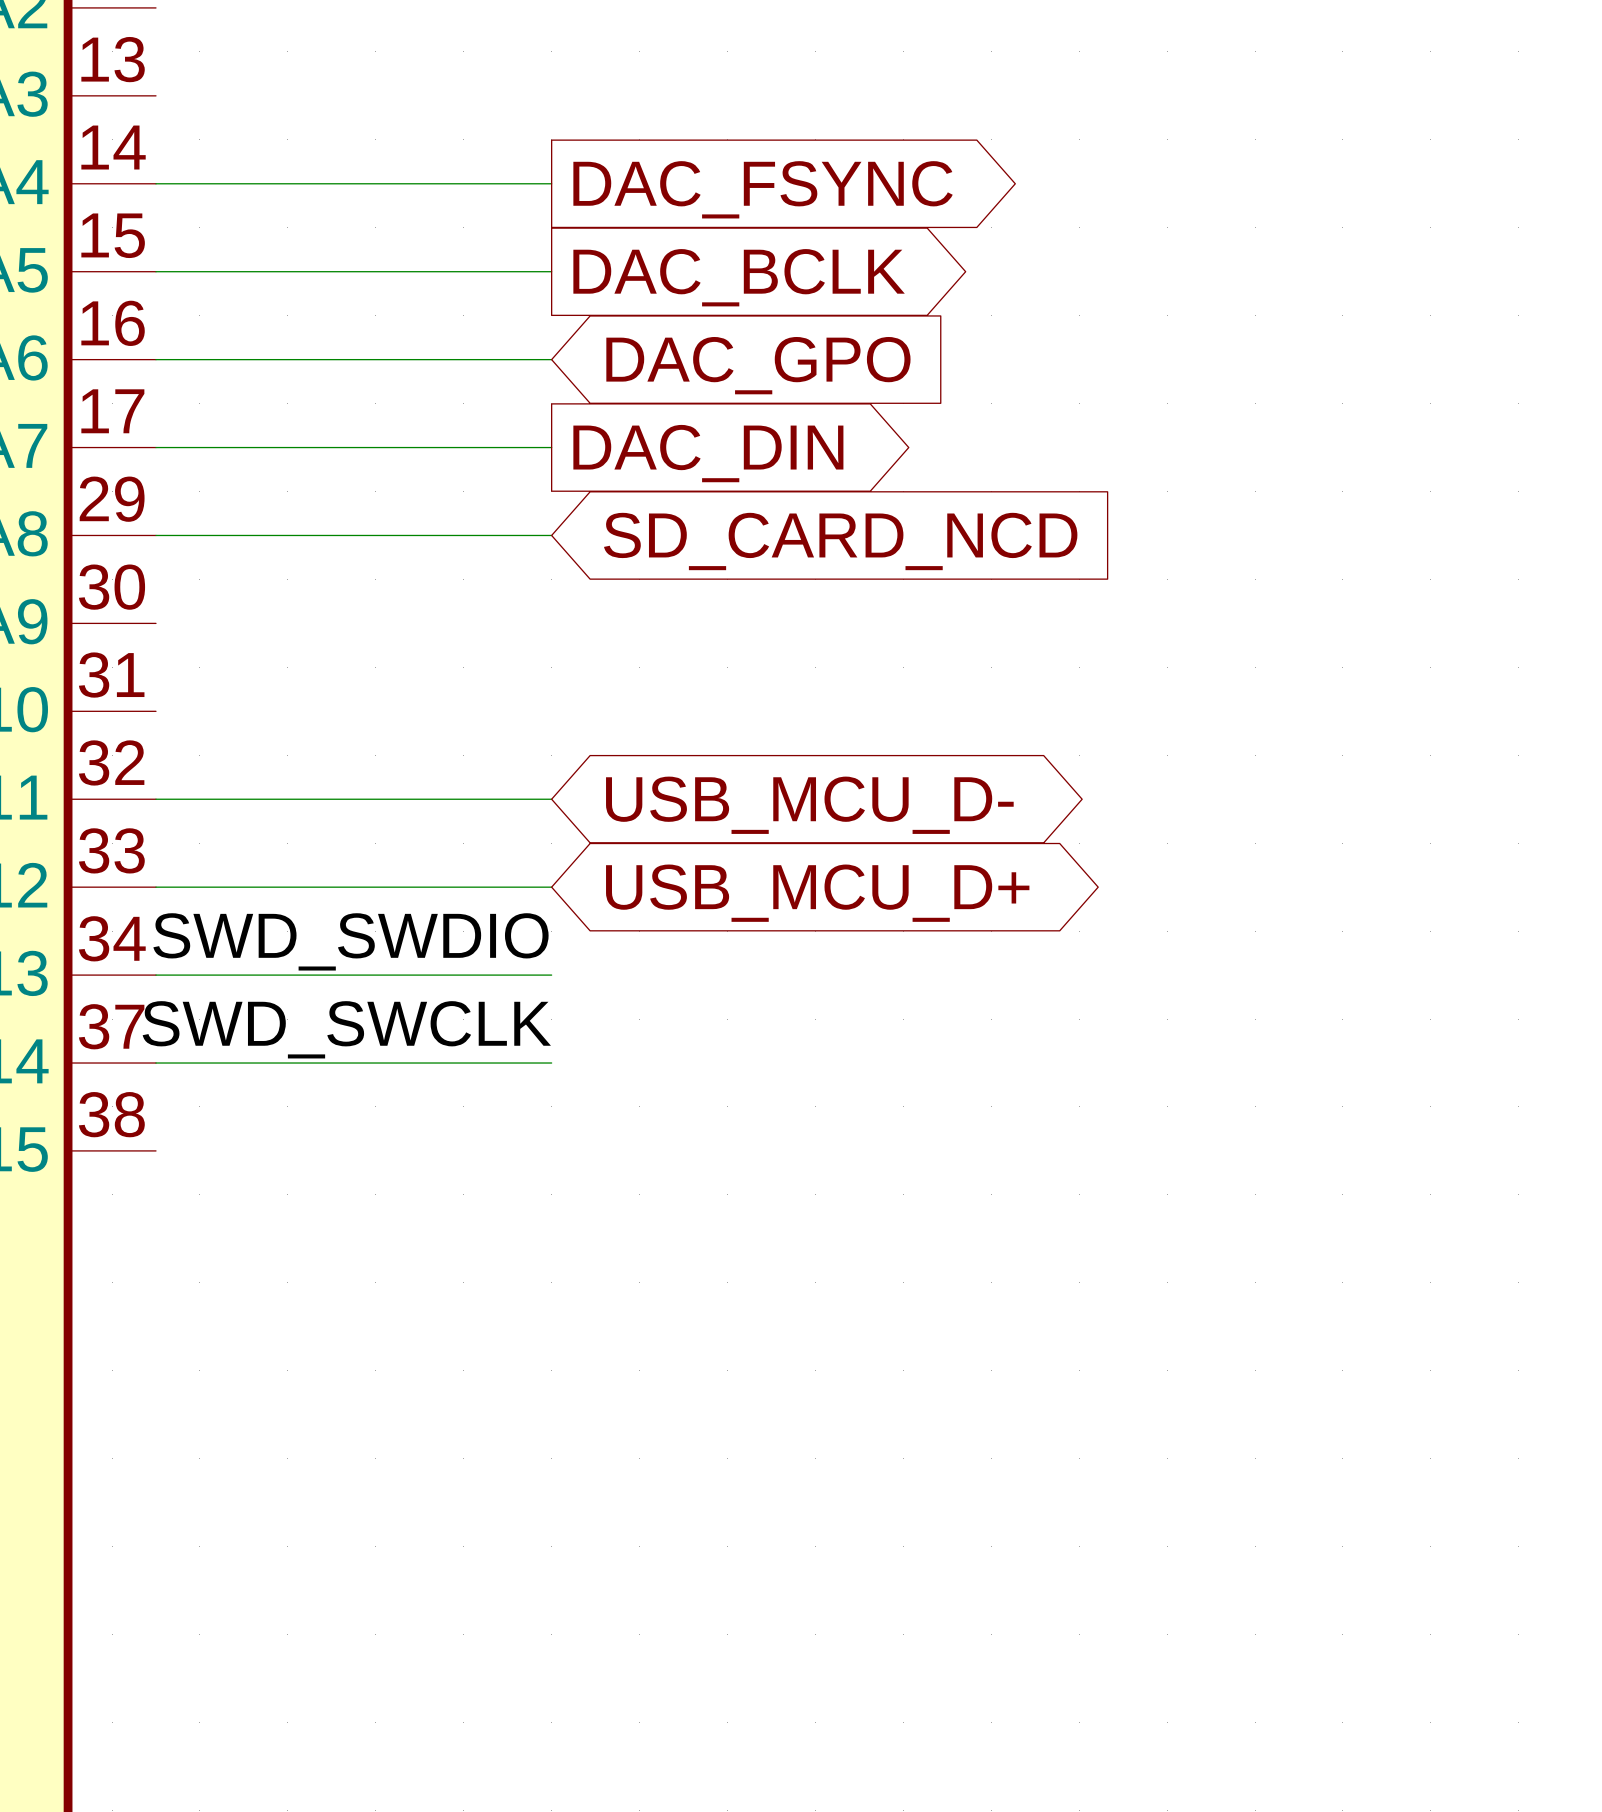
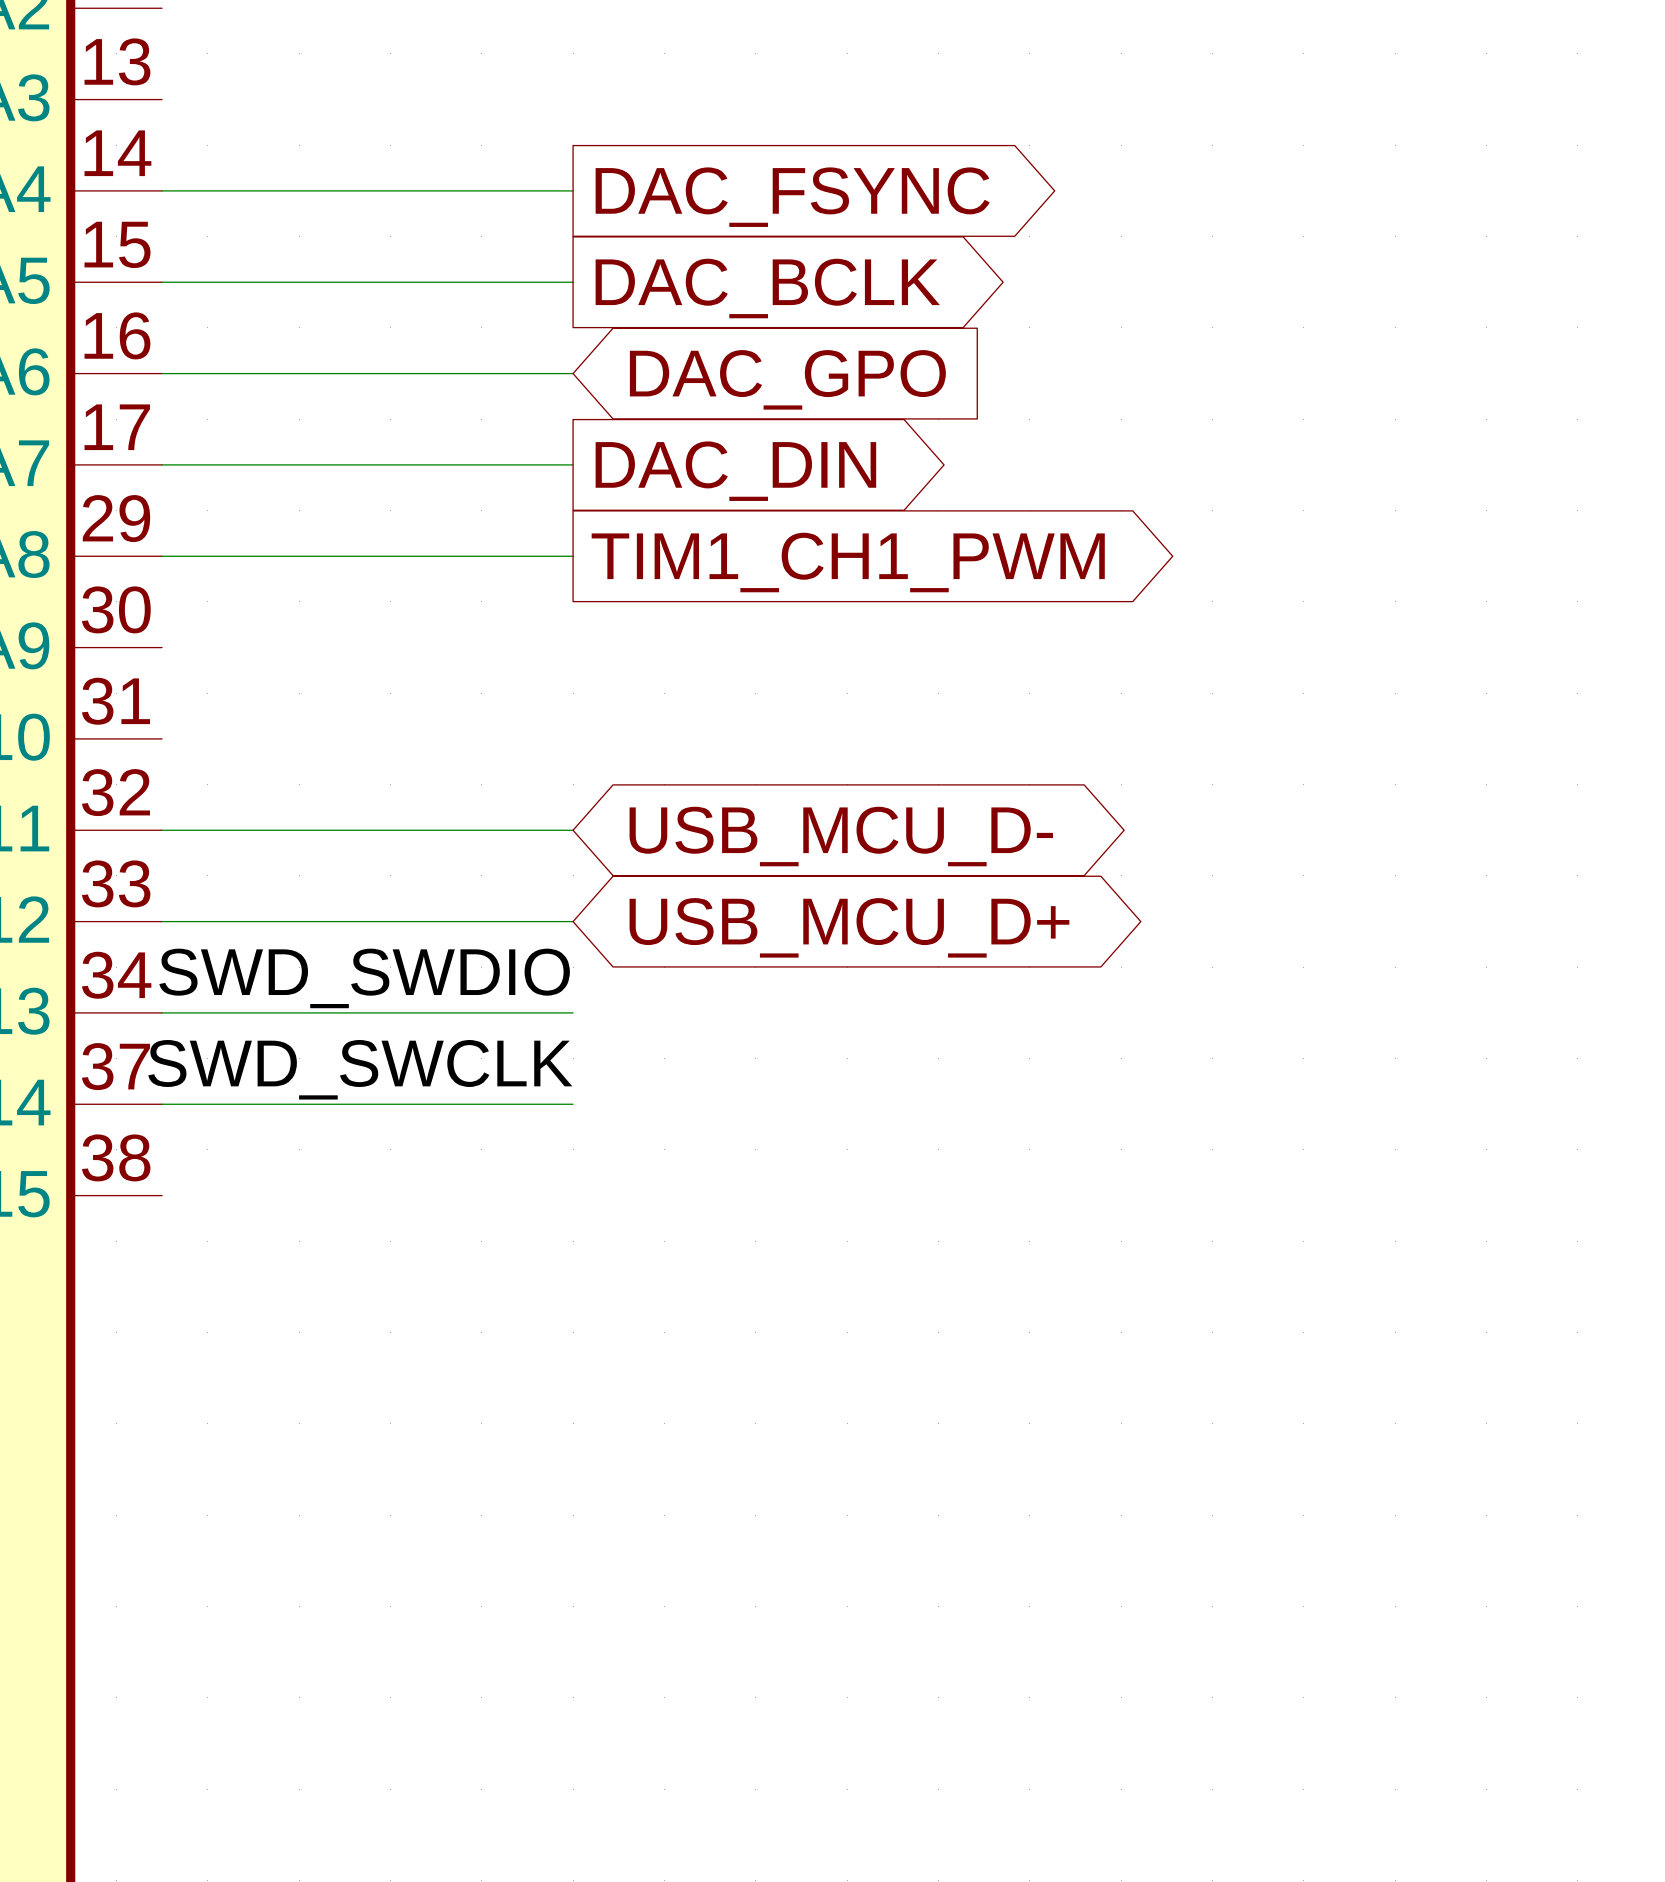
global label shape: input (840, 541) -> output (848, 562)
global label: SD_CARD_NCD (840, 541) -> TIM1_CH1_PWM (848, 562)

